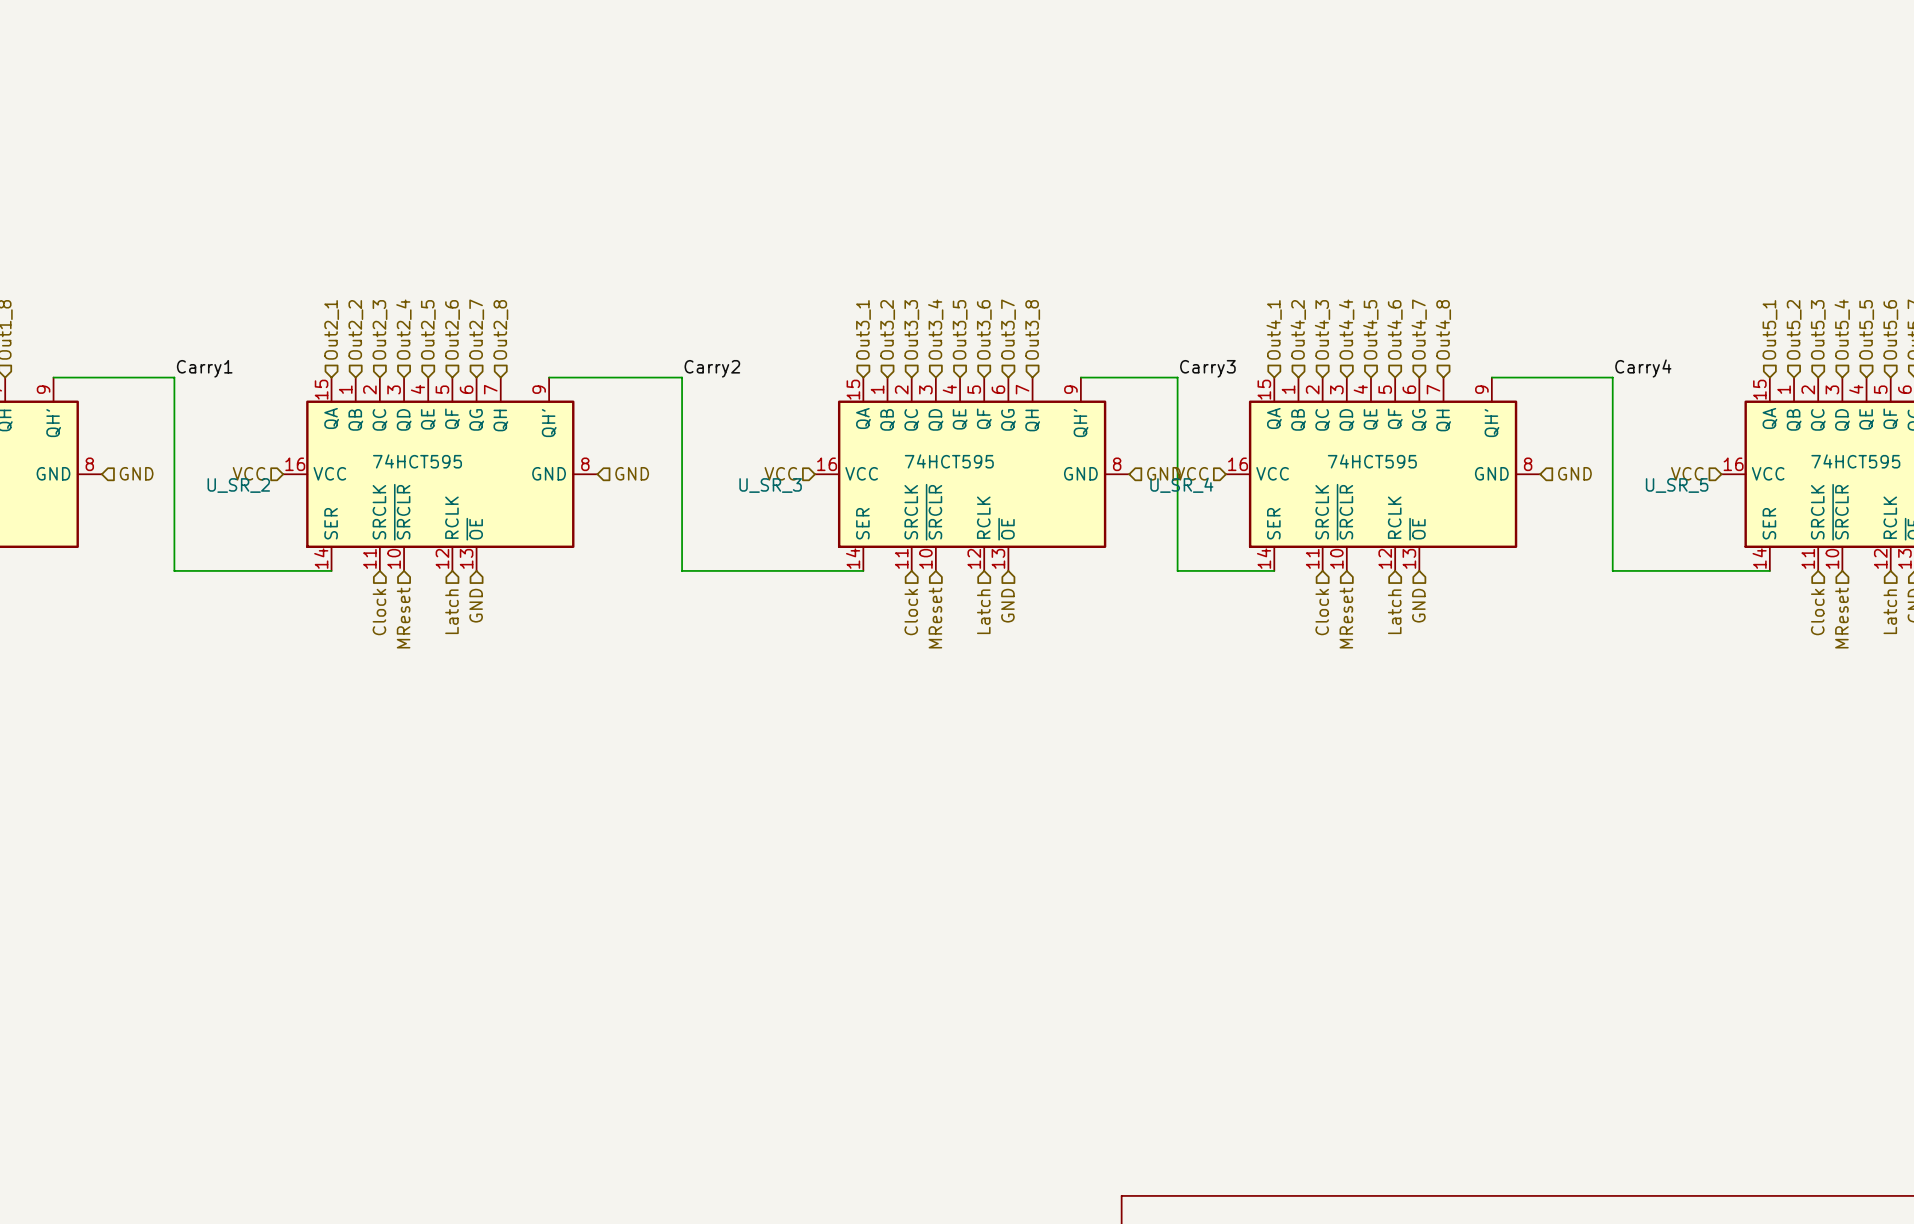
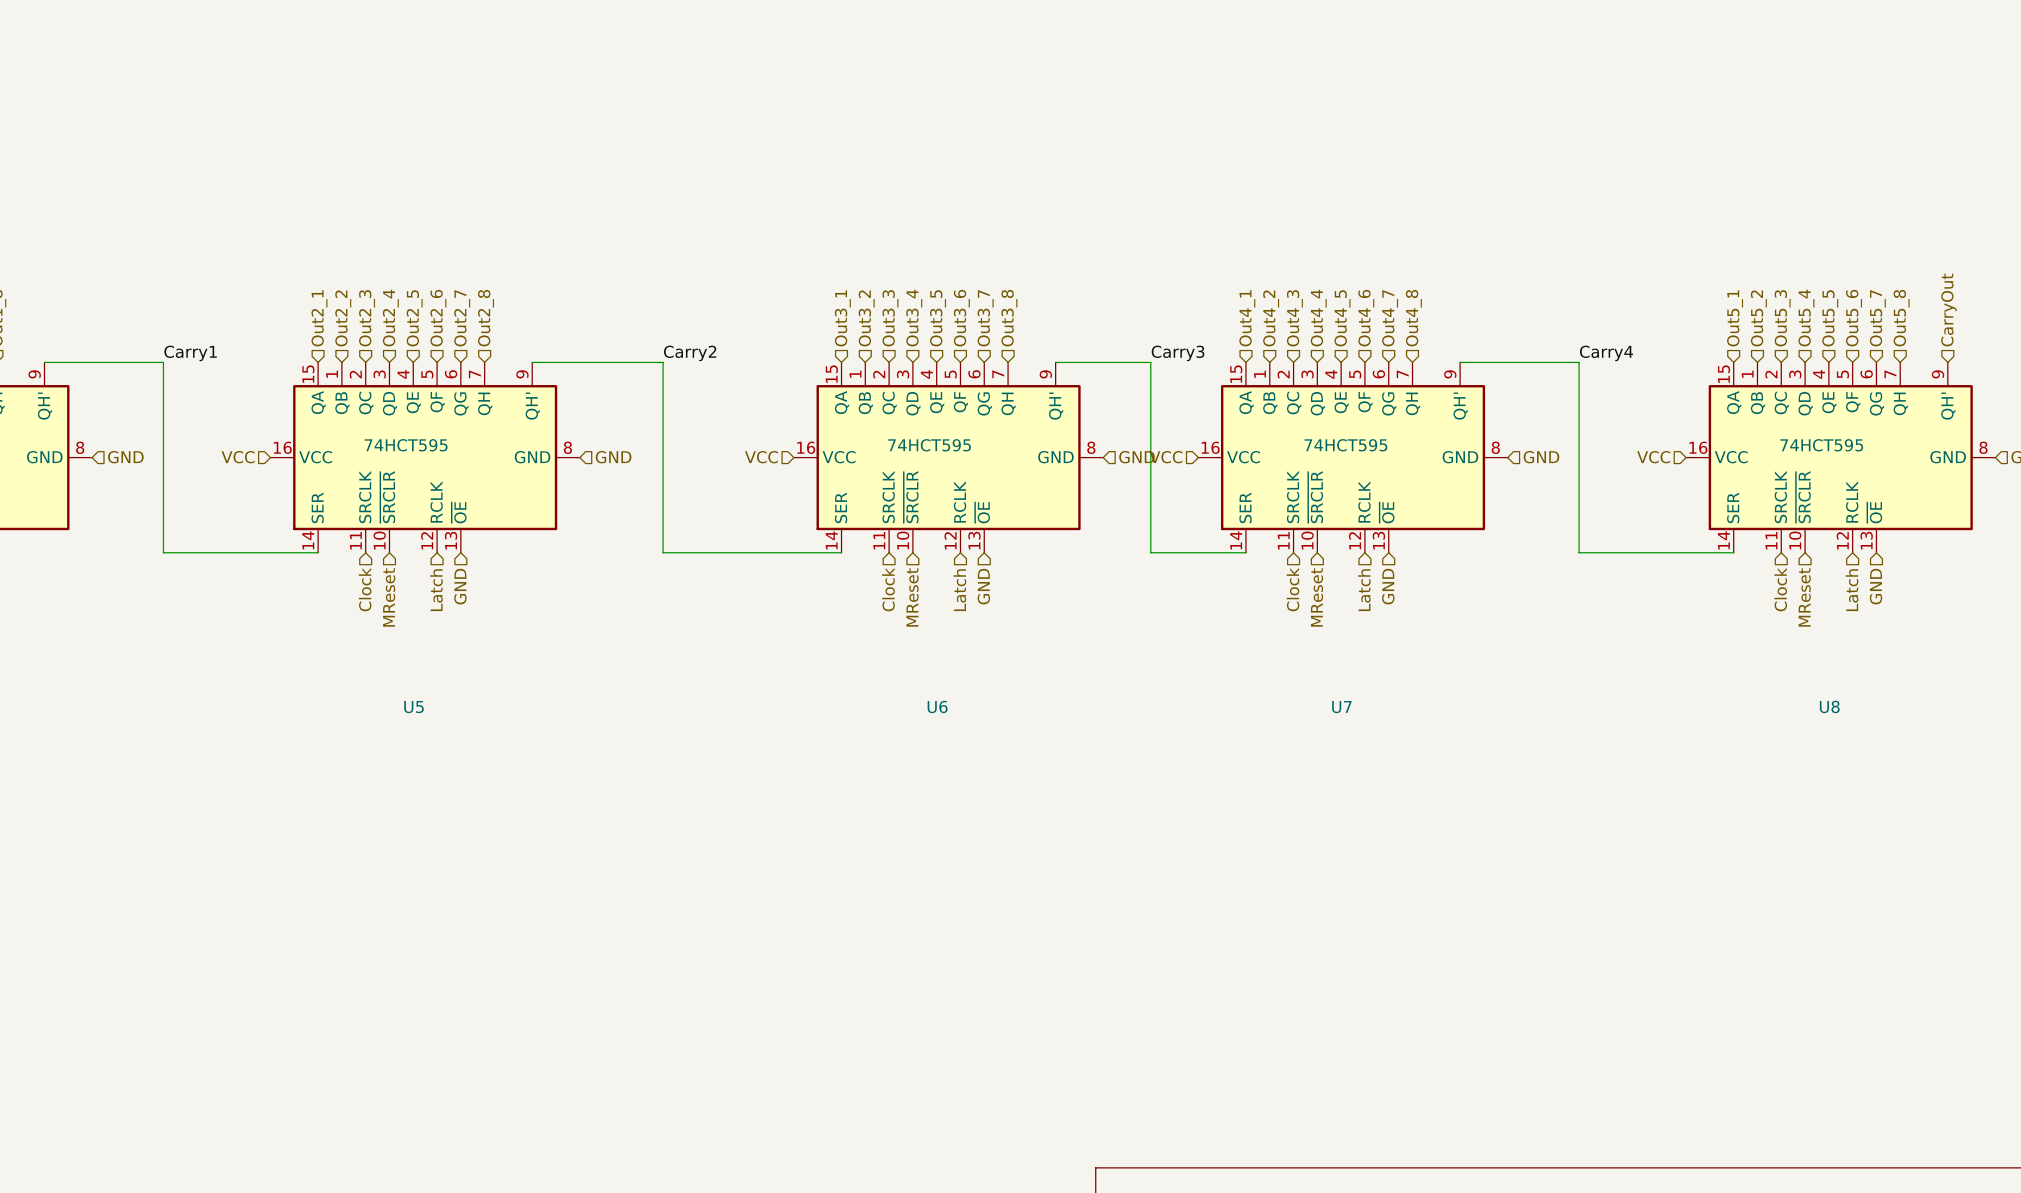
U_SR_2 name: U_SR_2 (238, 485) -> U5 (414, 707)
U_SR_3 name: U_SR_3 (770, 485) -> U6 (937, 706)
U_SR_4 name: U_SR_4 (1181, 485) -> U7 (1341, 707)
U_SR_5 name: U_SR_5 (1677, 485) -> U8 (1829, 706)

